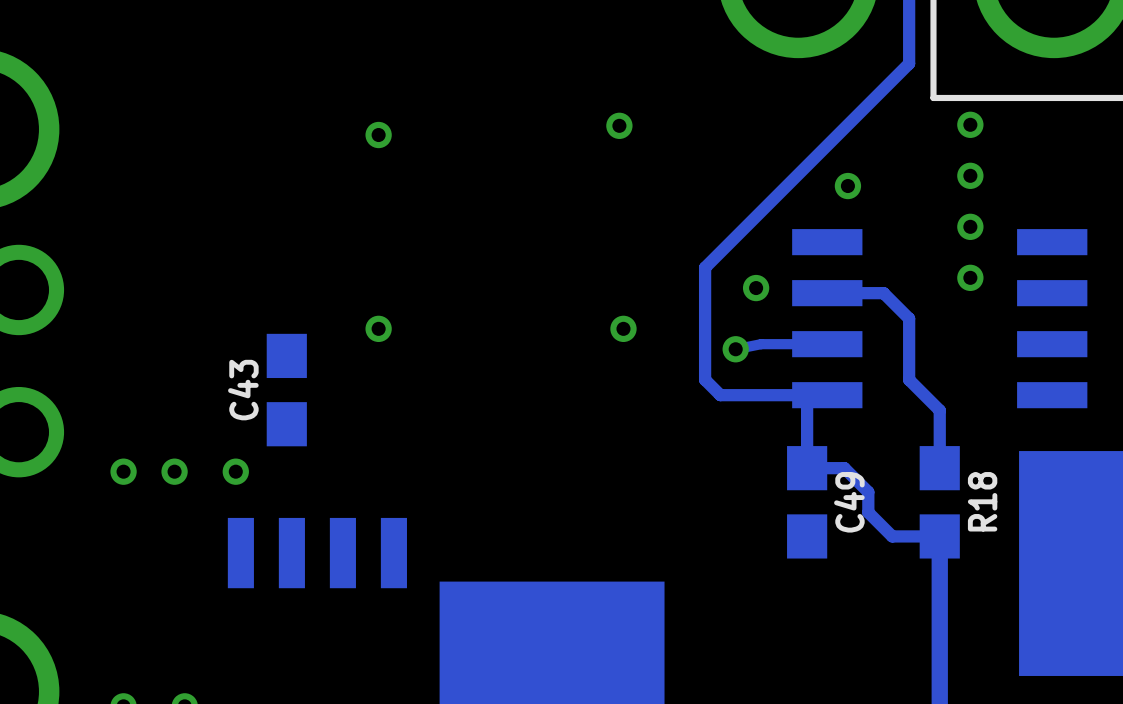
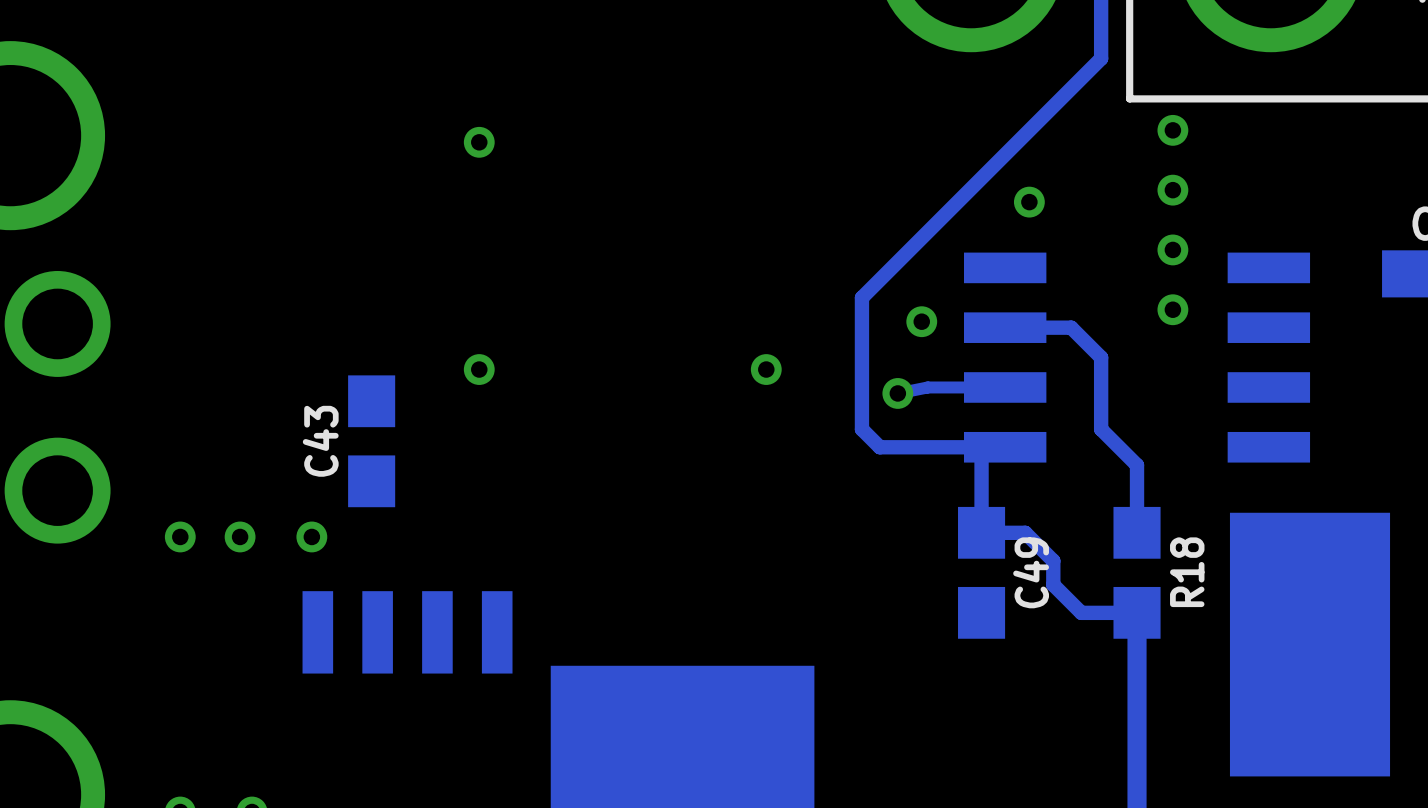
via: (619, 125) -> none

